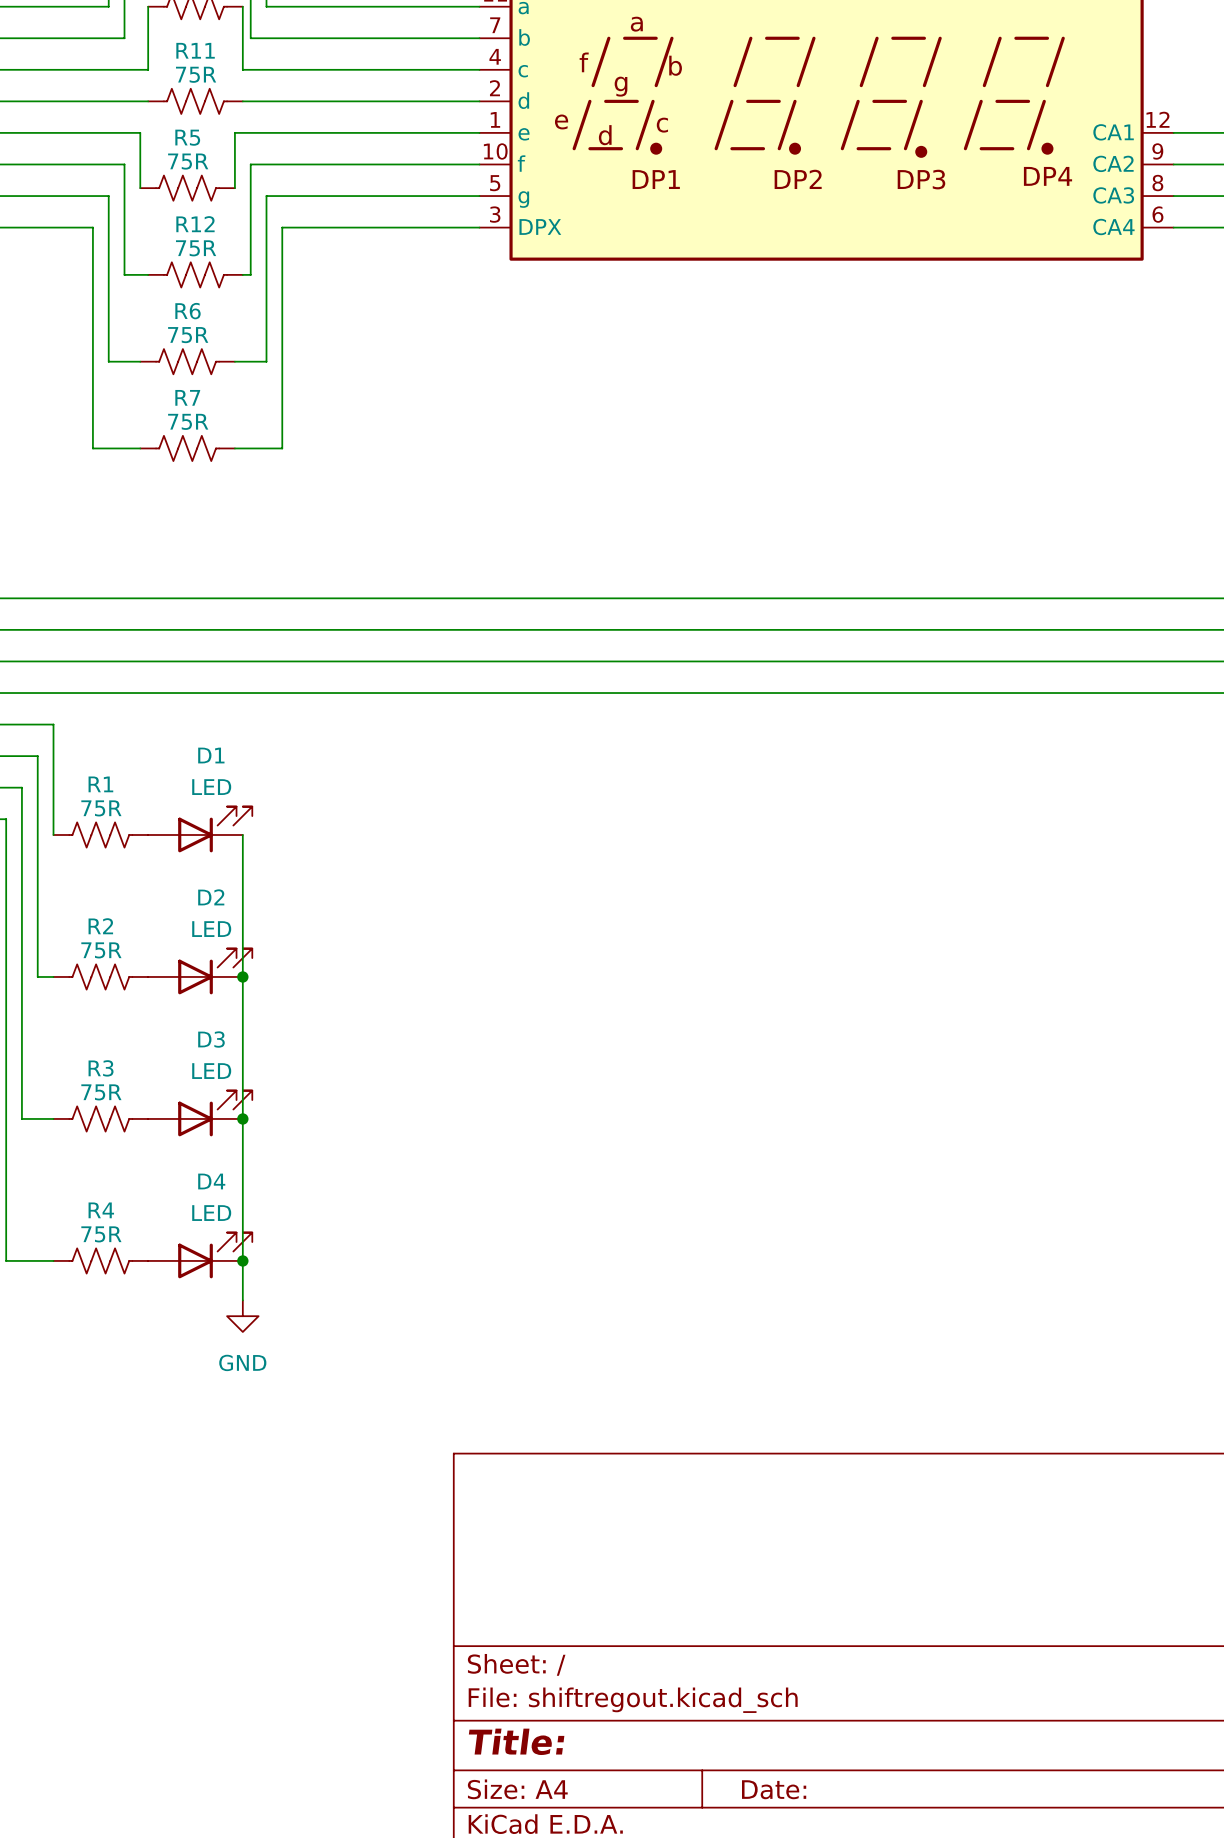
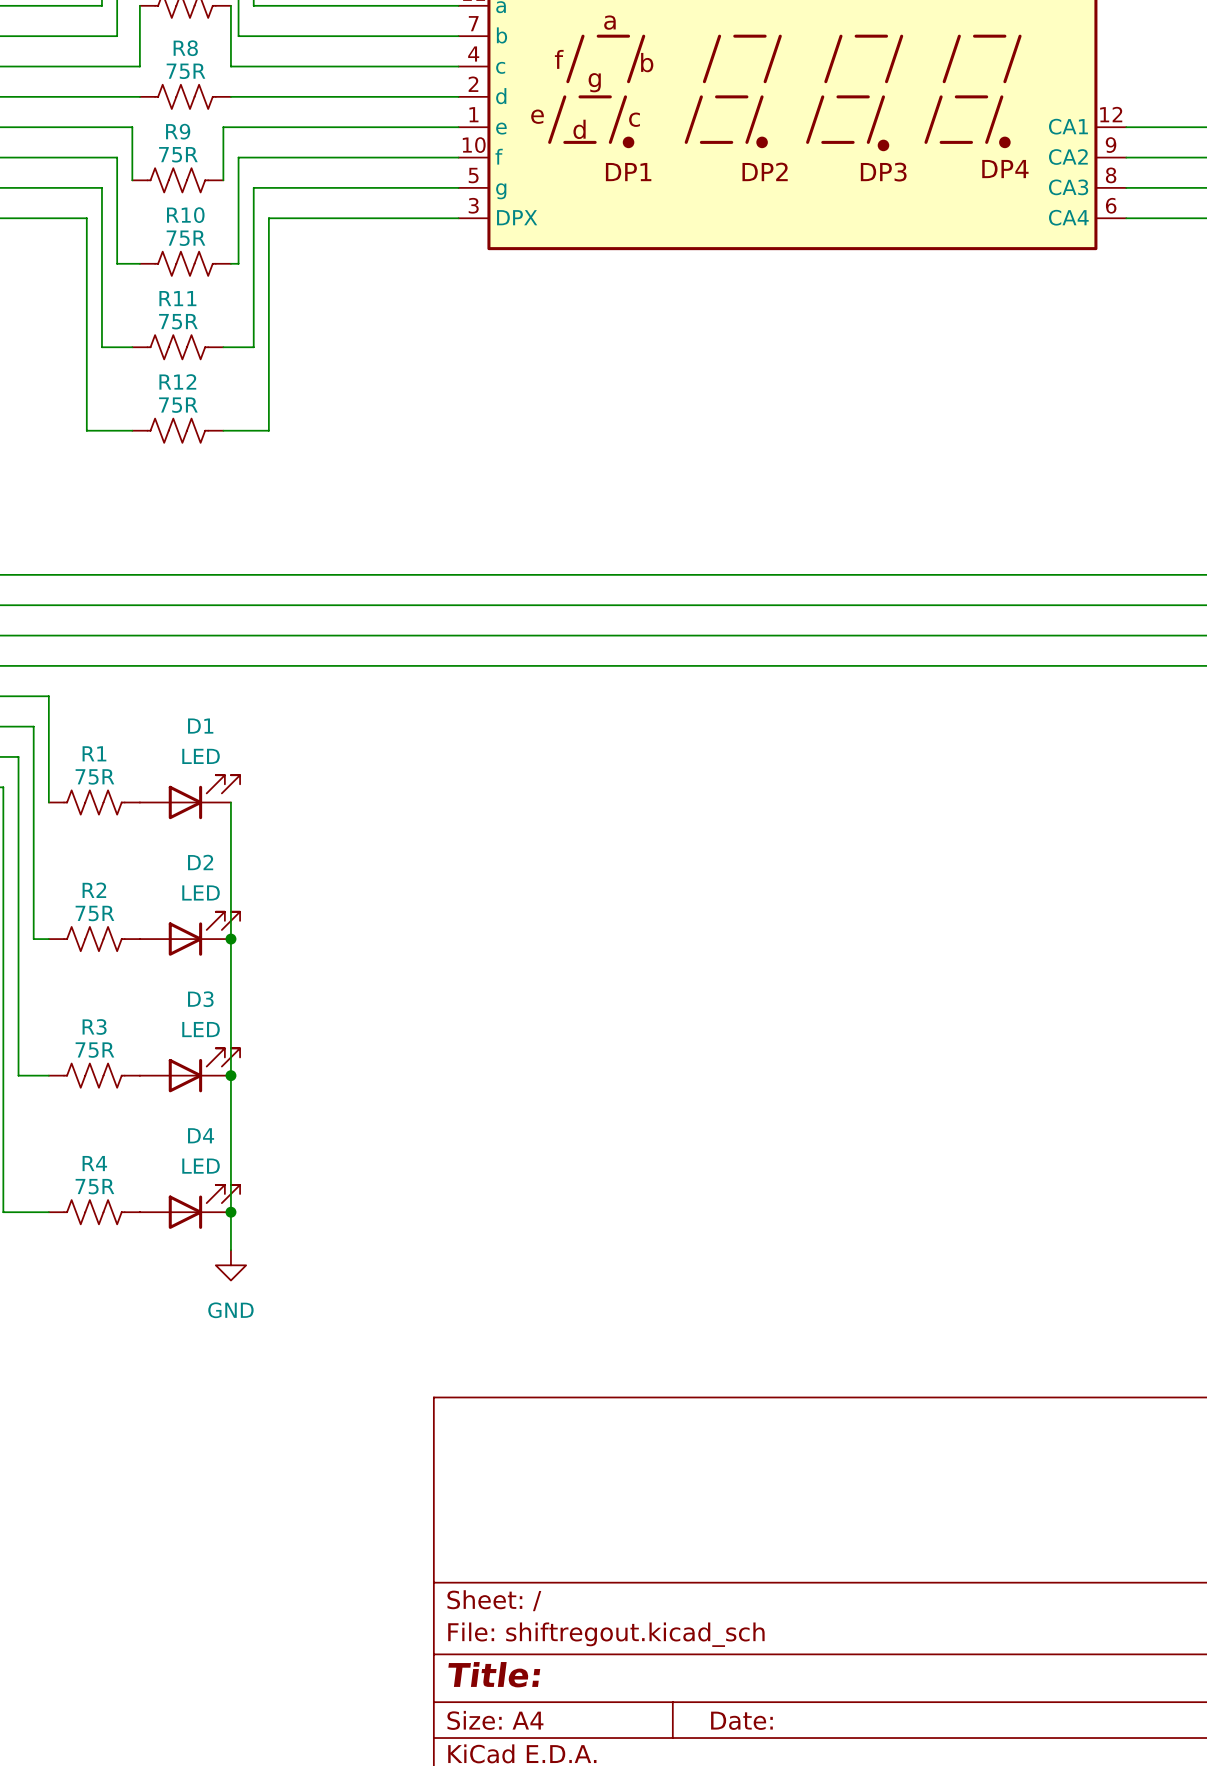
R11 name: R11 (195, 50) -> R8 (185, 48)
R5 name: R5 (187, 137) -> R9 (178, 131)
R12 name: R12 (195, 224) -> R10 (185, 215)
R6 name: R6 (187, 311) -> R11 (177, 298)
R7 name: R7 (187, 397) -> R12 (177, 381)

